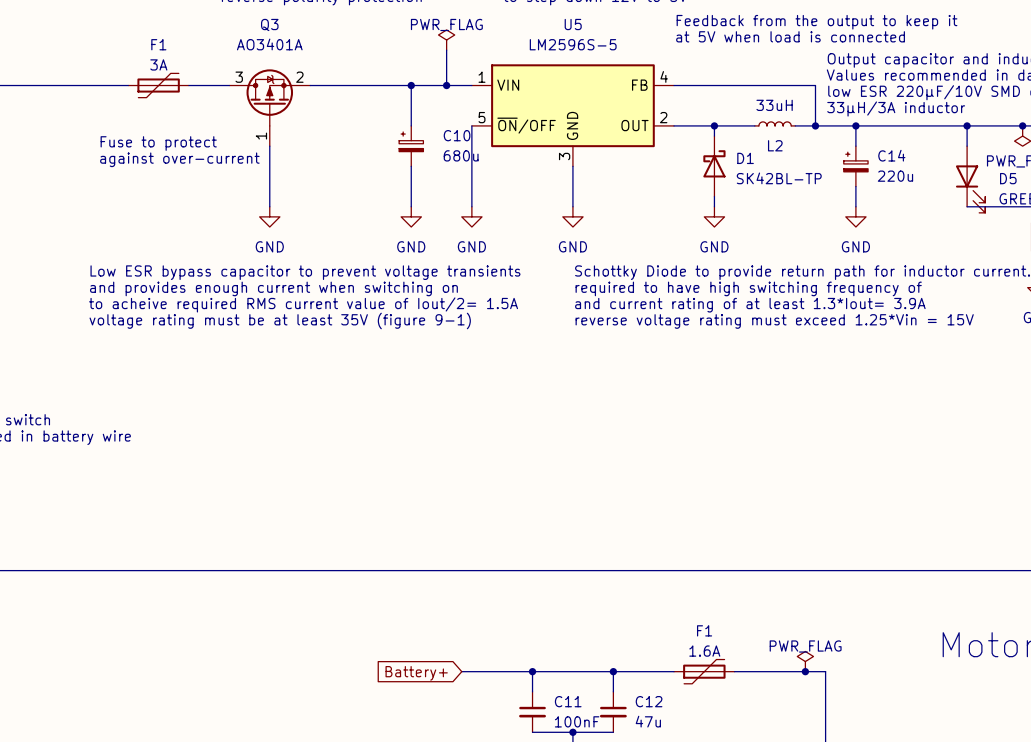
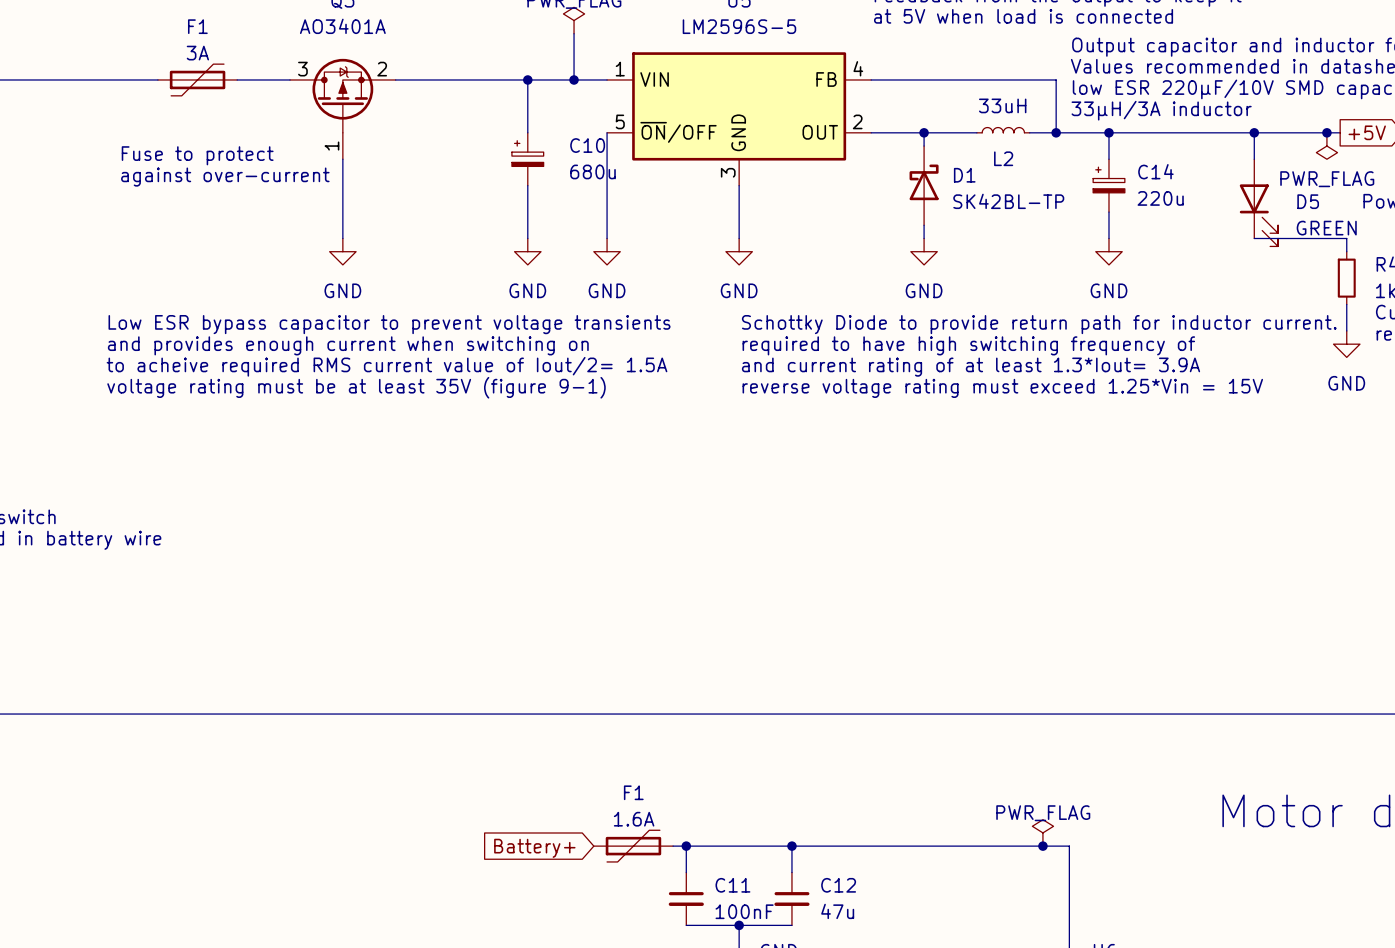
F1: none -> 1.6A (633, 846)
F1: 1.6A (704, 671) -> none

